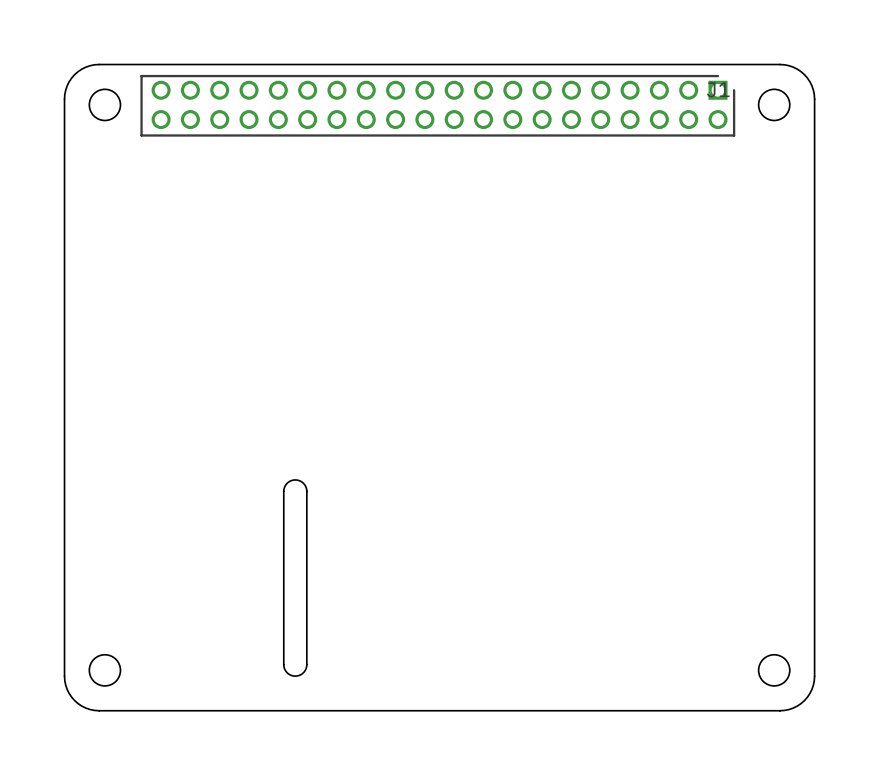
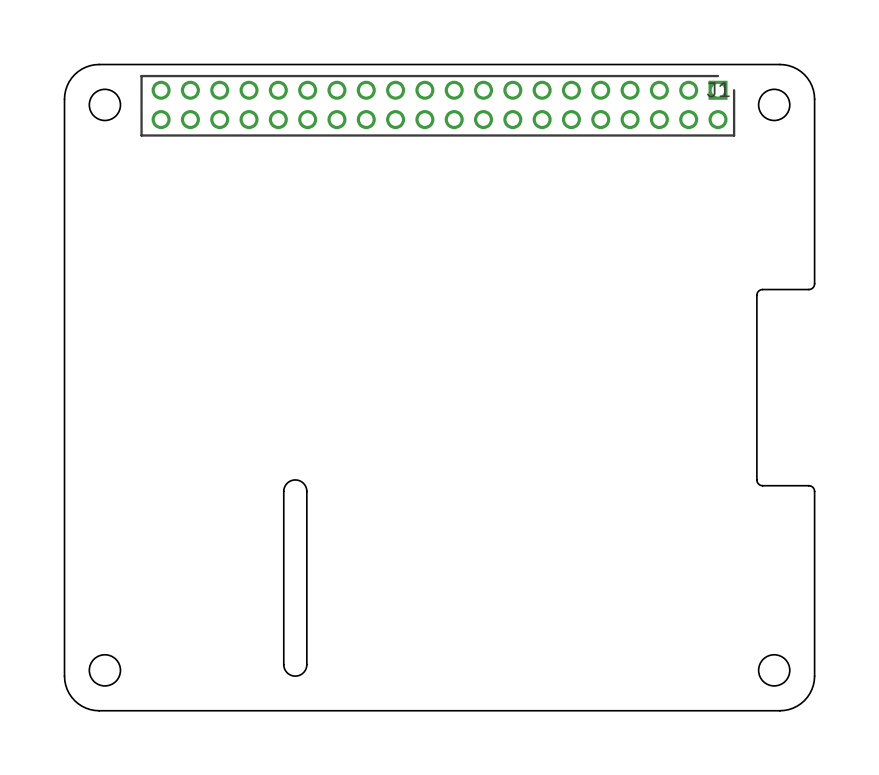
board edge: (814, 283) (814, 491) -> (814, 283) (809, 289) (761, 289) (756, 295) (757, 481) (761, 485) (809, 485) (814, 491)

